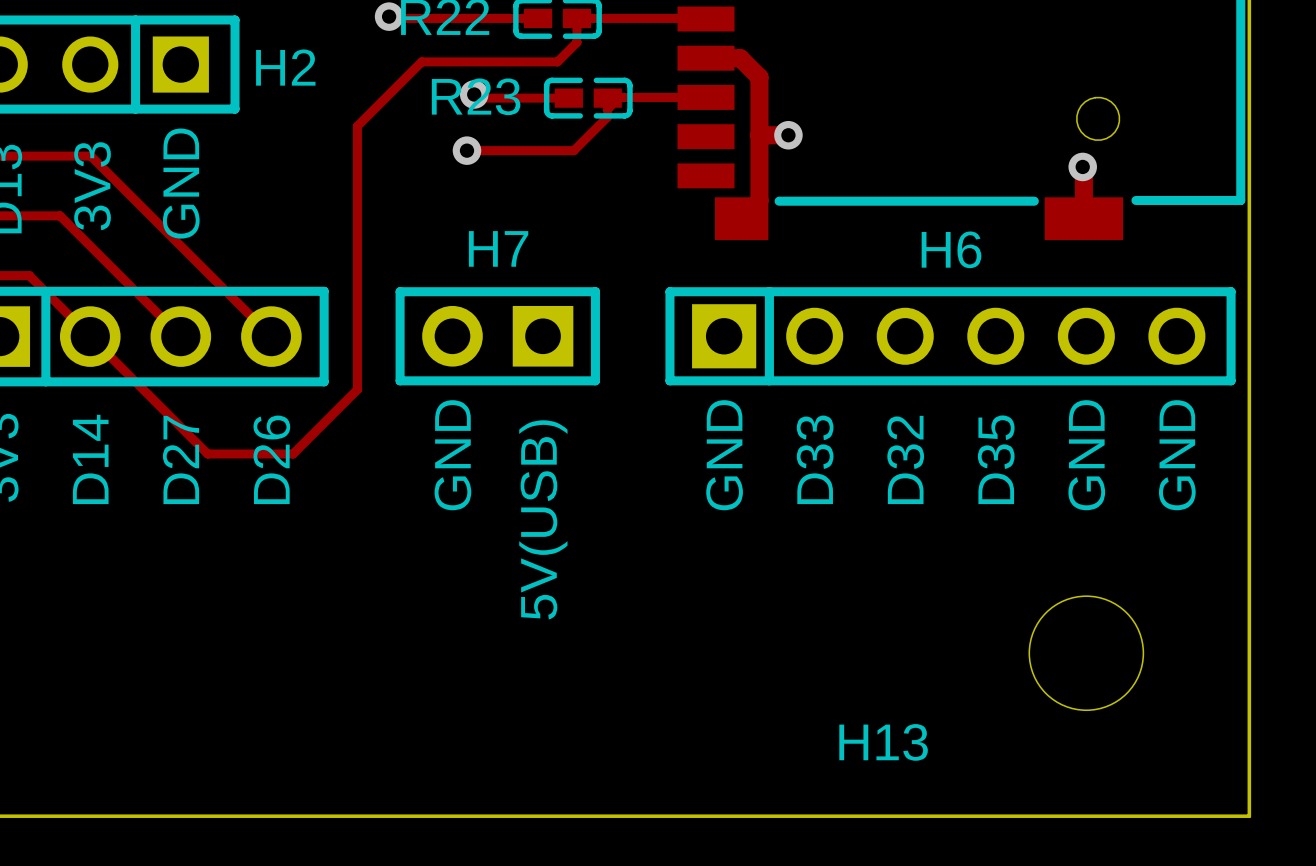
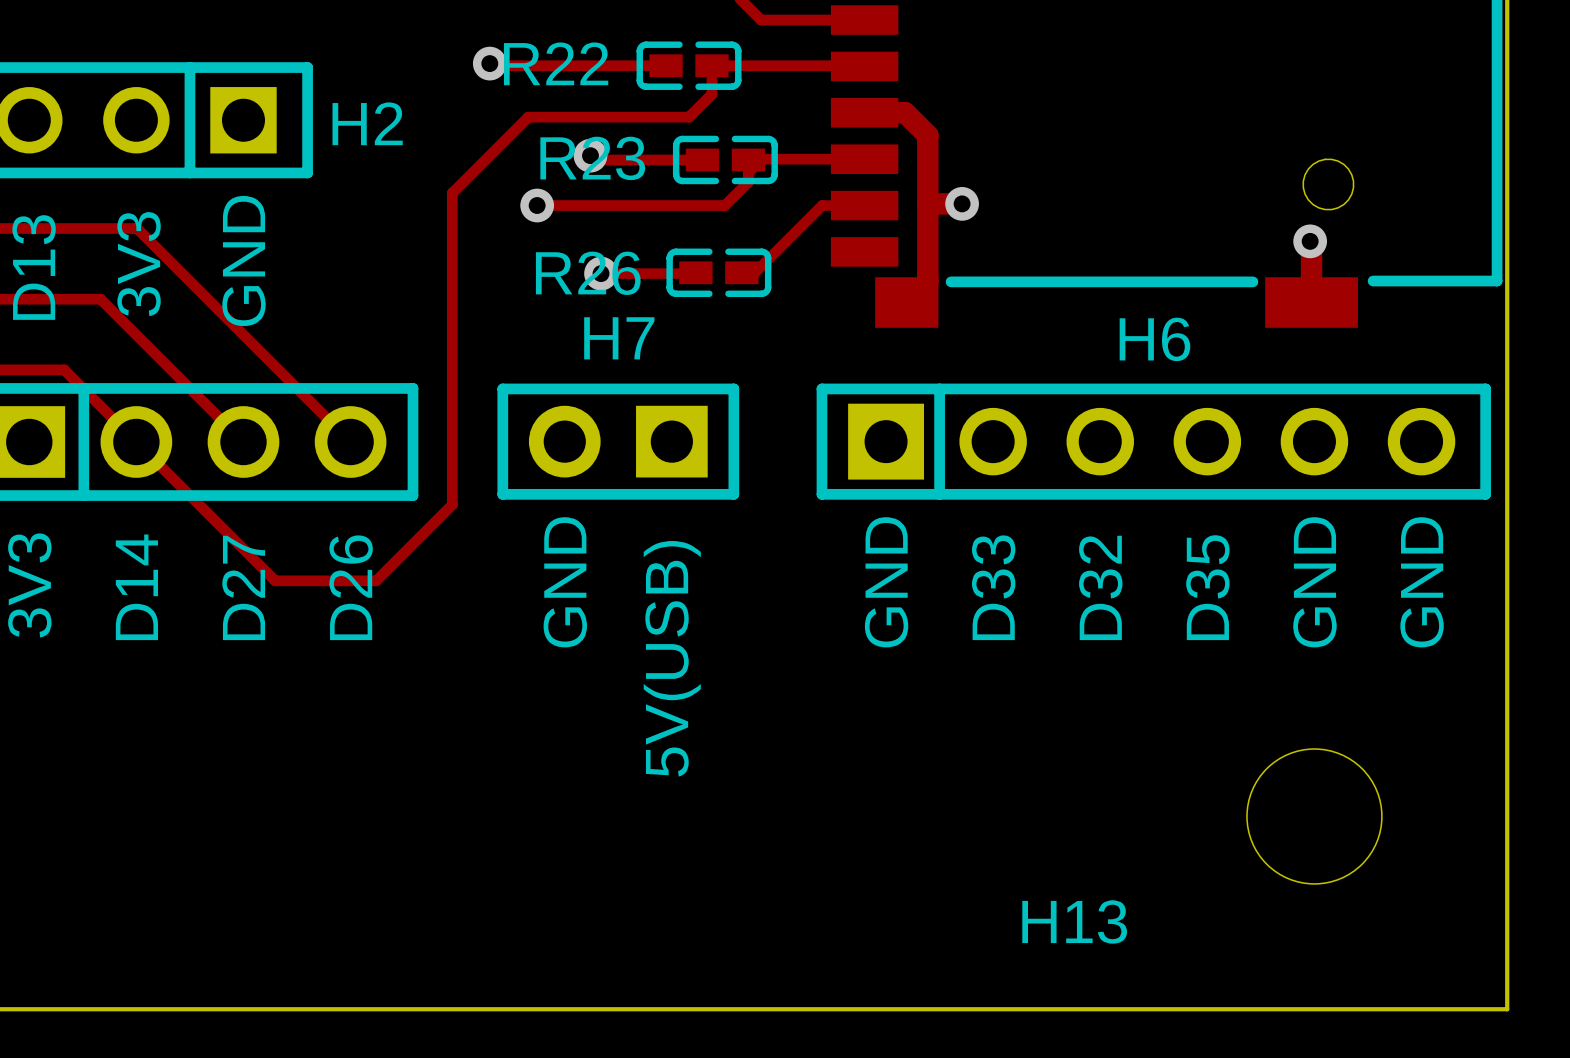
via: none -> (537, 205)
track: (587, 136) (573, 150) (466, 150) -> (724, 205) (537, 205)
track: none -> (864, 205) (822, 205) (754, 272) (741, 272)
via: (466, 150) -> none
track: none -> (695, 272) (601, 273)
R26: none -> (718, 272)
via: none -> (601, 273)

